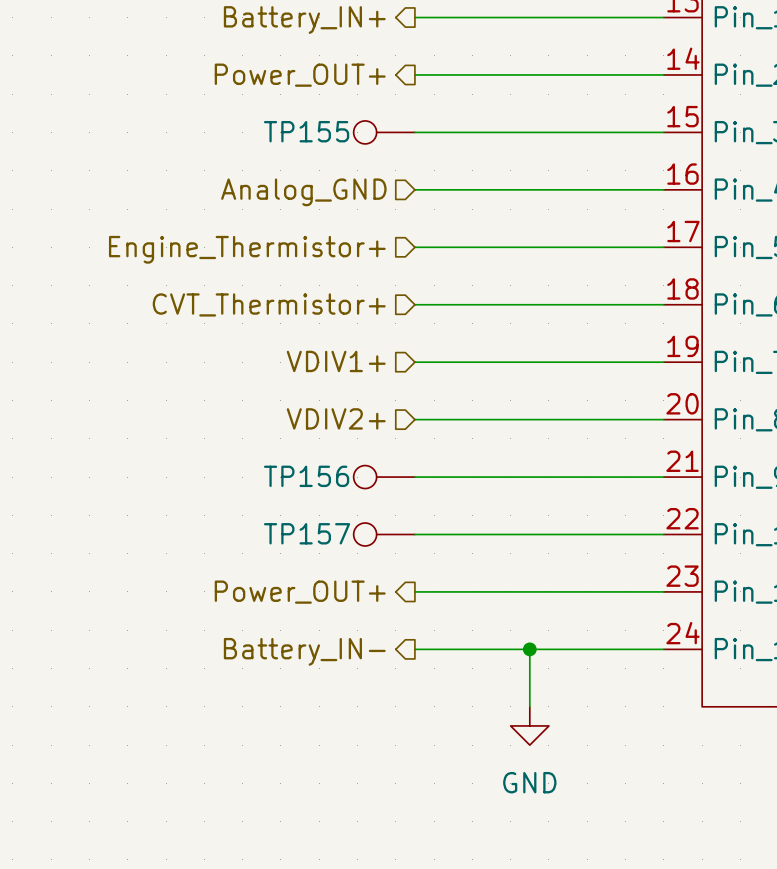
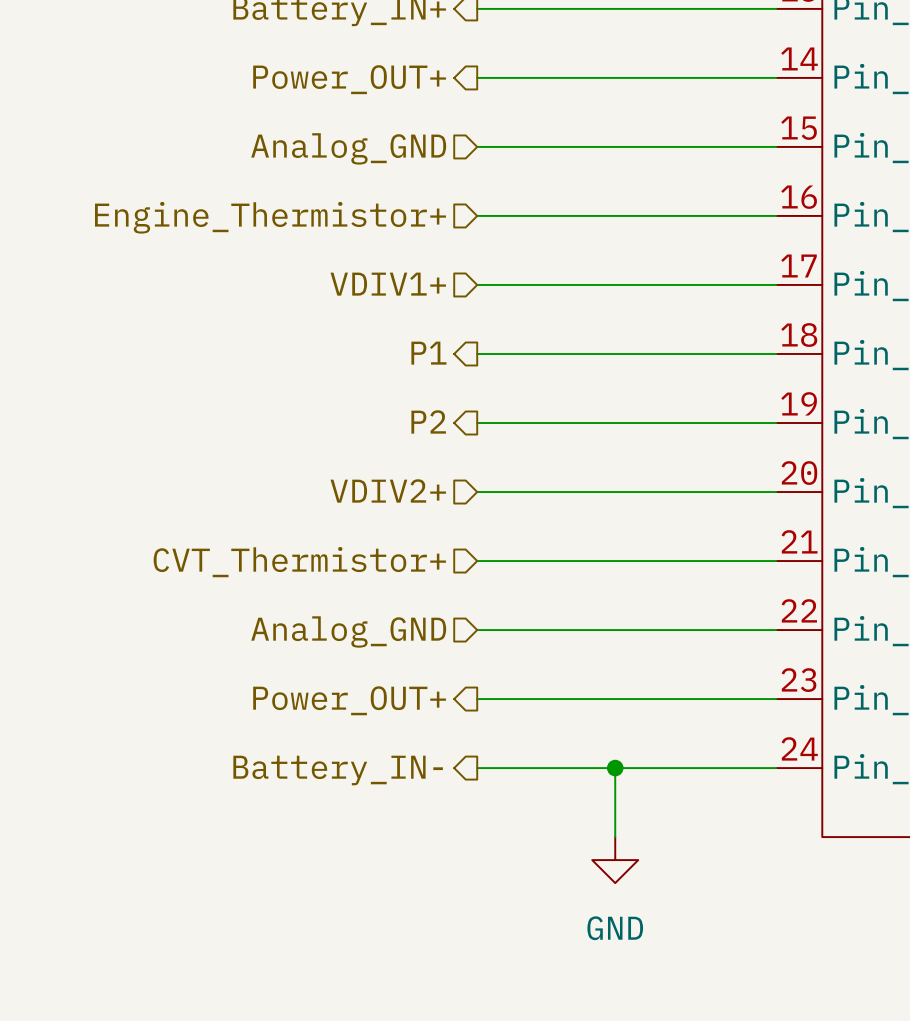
TP155: (384, 132) -> none
hierarchical label: none -> Analog_GND (348, 148)
hierarchical label: Analog_GND (303, 192) -> Engine_Thermistor+ (270, 217)
hierarchical label: Engine_Thermistor+ (247, 249) -> VDIV1+ (388, 284)
hierarchical label shape: input (269, 304) -> output (428, 353)
hierarchical label: CVT_Thermistor+ (269, 304) -> P1 (428, 353)
hierarchical label shape: input (336, 361) -> output (428, 421)
hierarchical label: VDIV1+ (336, 361) -> P2 (428, 421)
hierarchical label: none -> CVT_Thermistor+ (299, 562)
TP156: (384, 477) -> none
TP157: (384, 534) -> none
hierarchical label: none -> Analog_GND (348, 631)

